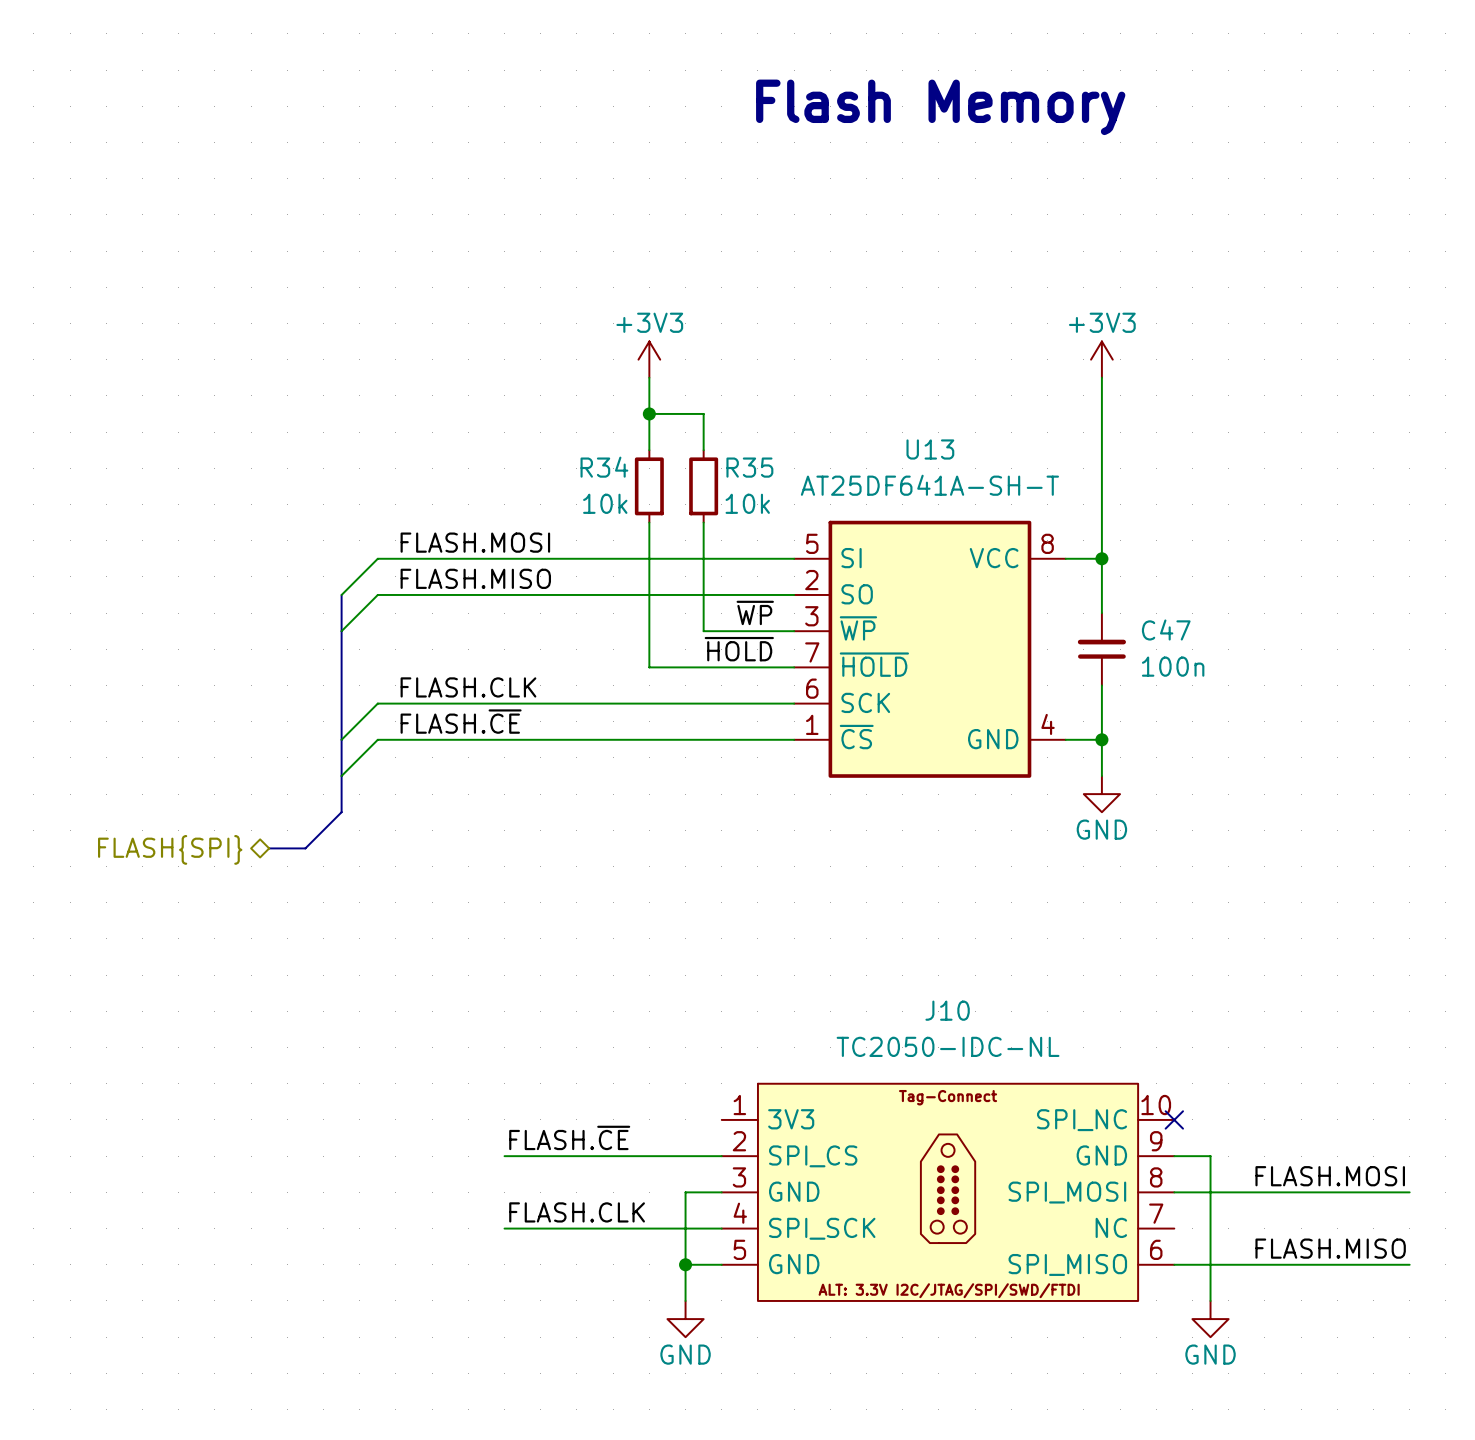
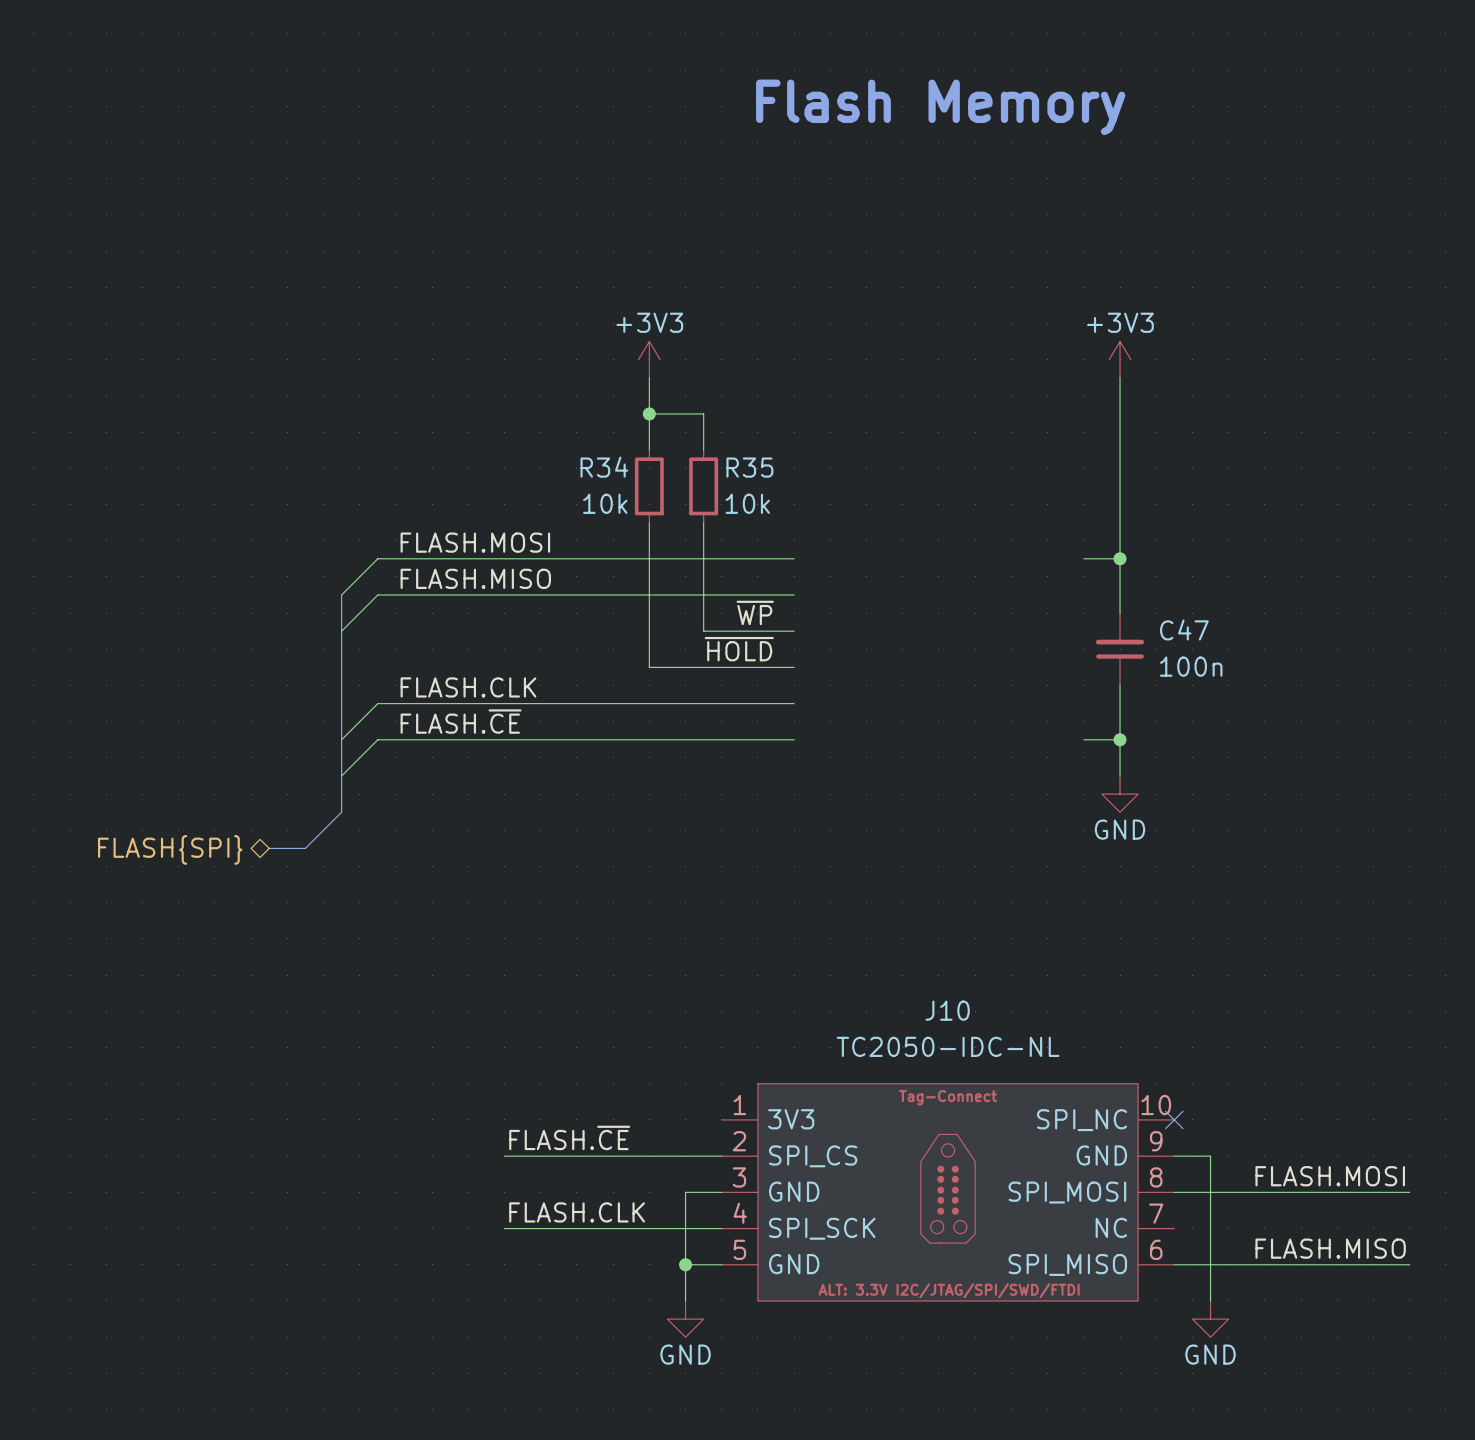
power symbol position: +3V3 (1101, 359) -> +3V3 (1120, 359)
wire: (1101, 377) (1101, 613) -> (1120, 377) (1120, 613)
wire: (1065, 558) (1083, 558) -> (1101, 558) (1120, 558)
junction position: (1101, 558) -> (1120, 558)
U13: (929, 649) -> none
C47 position: (1101, 649) -> (1120, 649)
wire: (1101, 685) (1101, 776) -> (1120, 685) (1120, 776)
wire: (1065, 739) (1083, 739) -> (1101, 739) (1120, 739)
junction position: (1101, 739) -> (1120, 739)
power symbol position: GND (1101, 794) -> GND (1120, 794)

